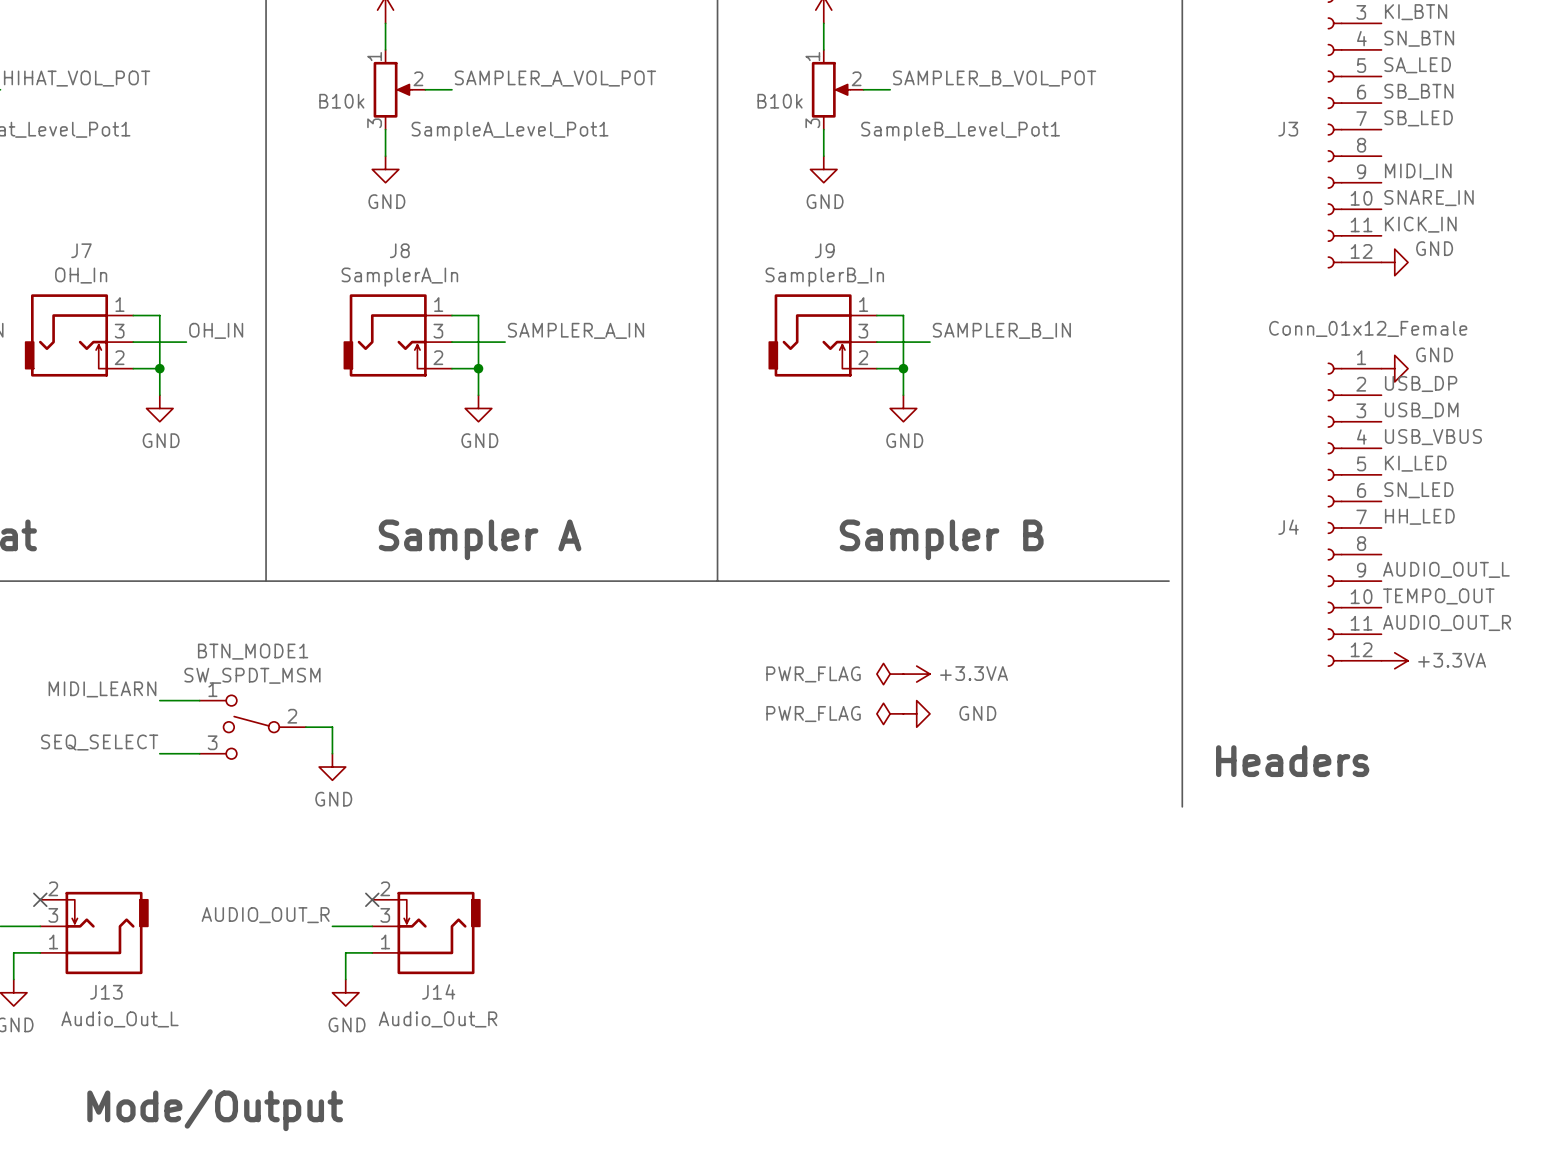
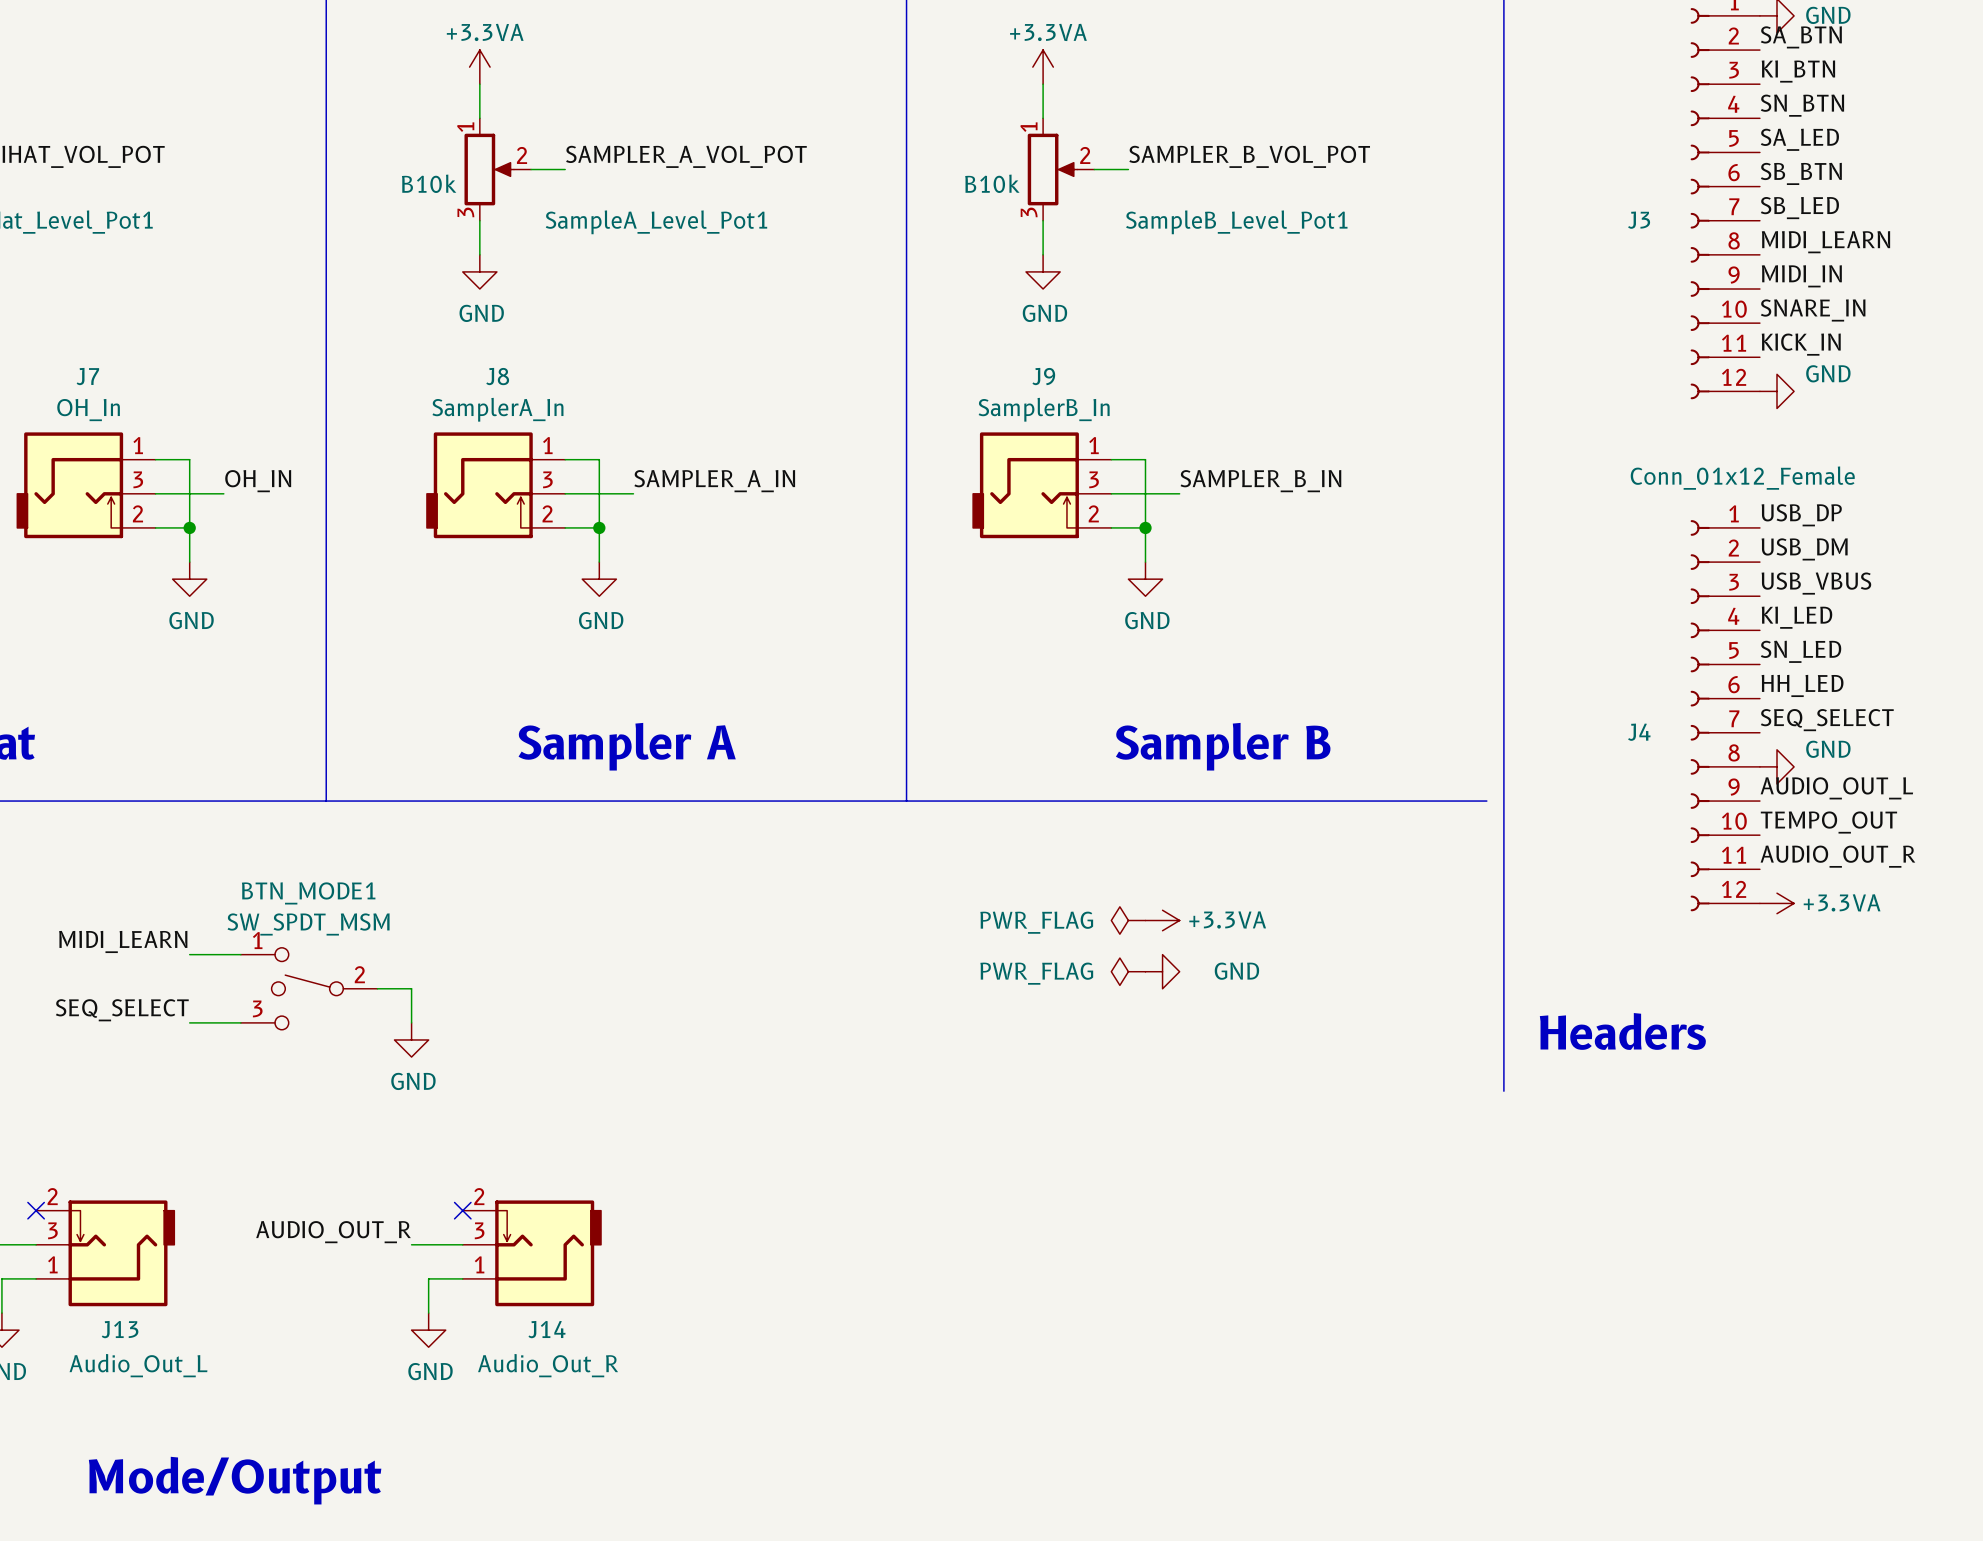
label: none -> MIDI_LEARN (1825, 242)
label: none -> USB_DP (1801, 515)
power symbol position: GND (1394, 368) -> GND (1777, 766)
label: USB_DP (1421, 383) -> USB_DM (1804, 549)
label: USB_DM (1421, 410) -> USB_VBUS (1816, 583)
label: USB_VBUS (1433, 437) -> KI_LED (1796, 617)
label: KI_LED (1415, 463) -> SN_LED (1801, 651)
label: SN_LED (1418, 490) -> HH_LED (1802, 685)
label: HH_LED (1419, 516) -> SEQ_SELECT (1827, 720)

